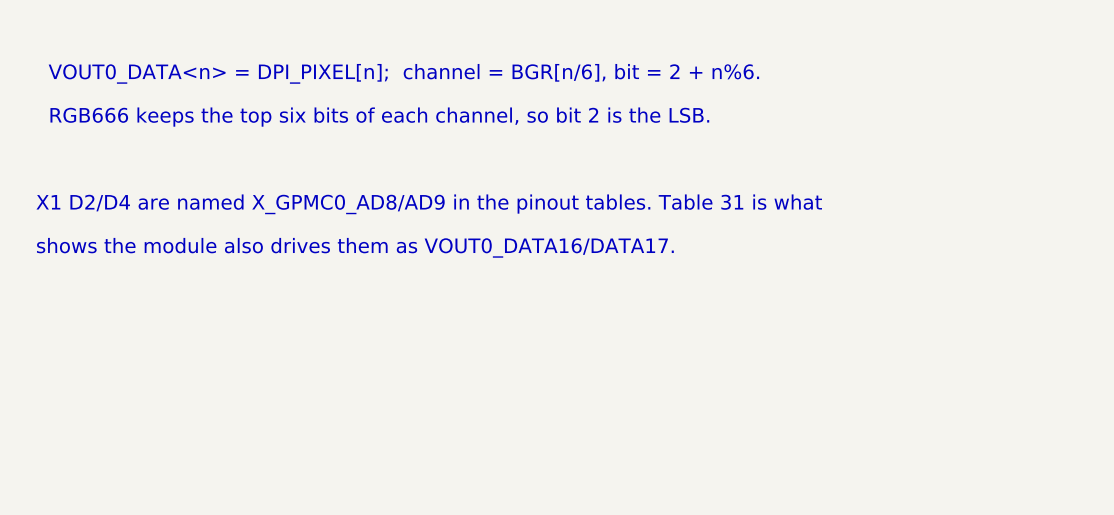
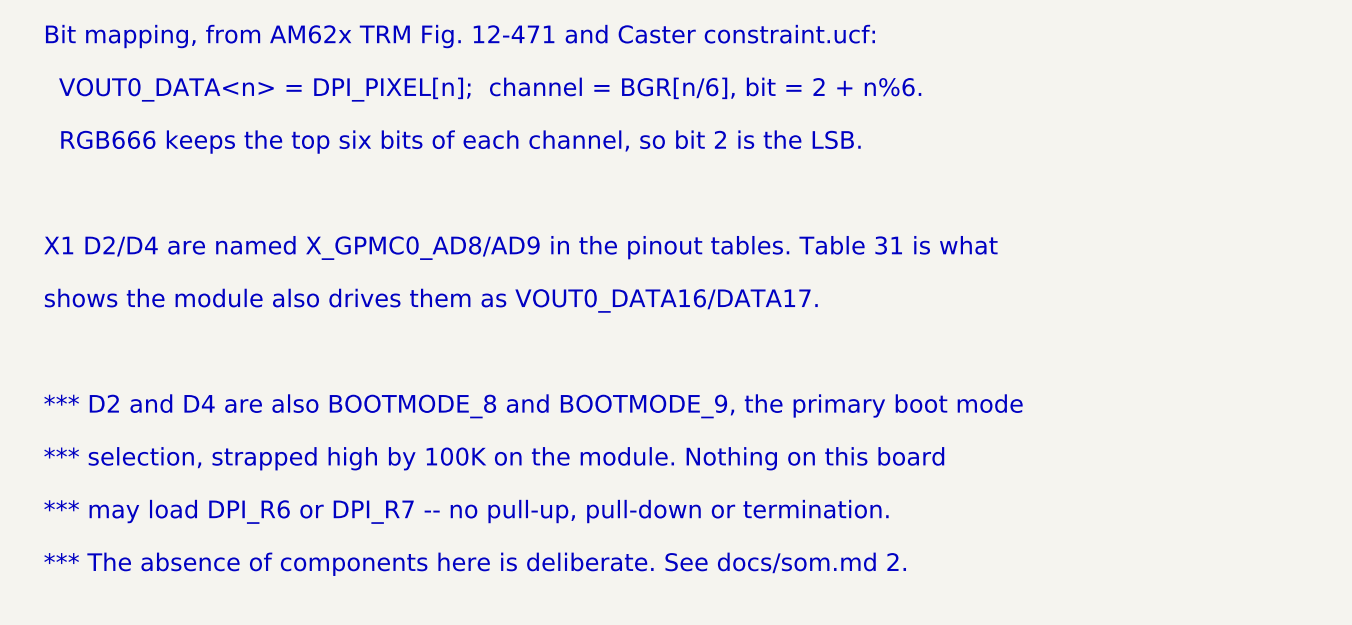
text: none -> Bit mapping, from AM62x TRM Fig. 12-471 and Caster constraint.ucf: (460, 36)
text: none -> *** D2 and D4 are also BOOTMODE_8 and BOOTMODE_9, the primary boot mode (533, 406)
text: none -> *** selection, strapped high by 100K on the module. Nothing on this board (494, 458)
text: none -> *** may load DPI_R6 or DPI_R7 -- no pull-up, pull-down or termination. (466, 511)
text: none -> *** The absence of components here is deliberate. See docs/som.md 2. (475, 564)

